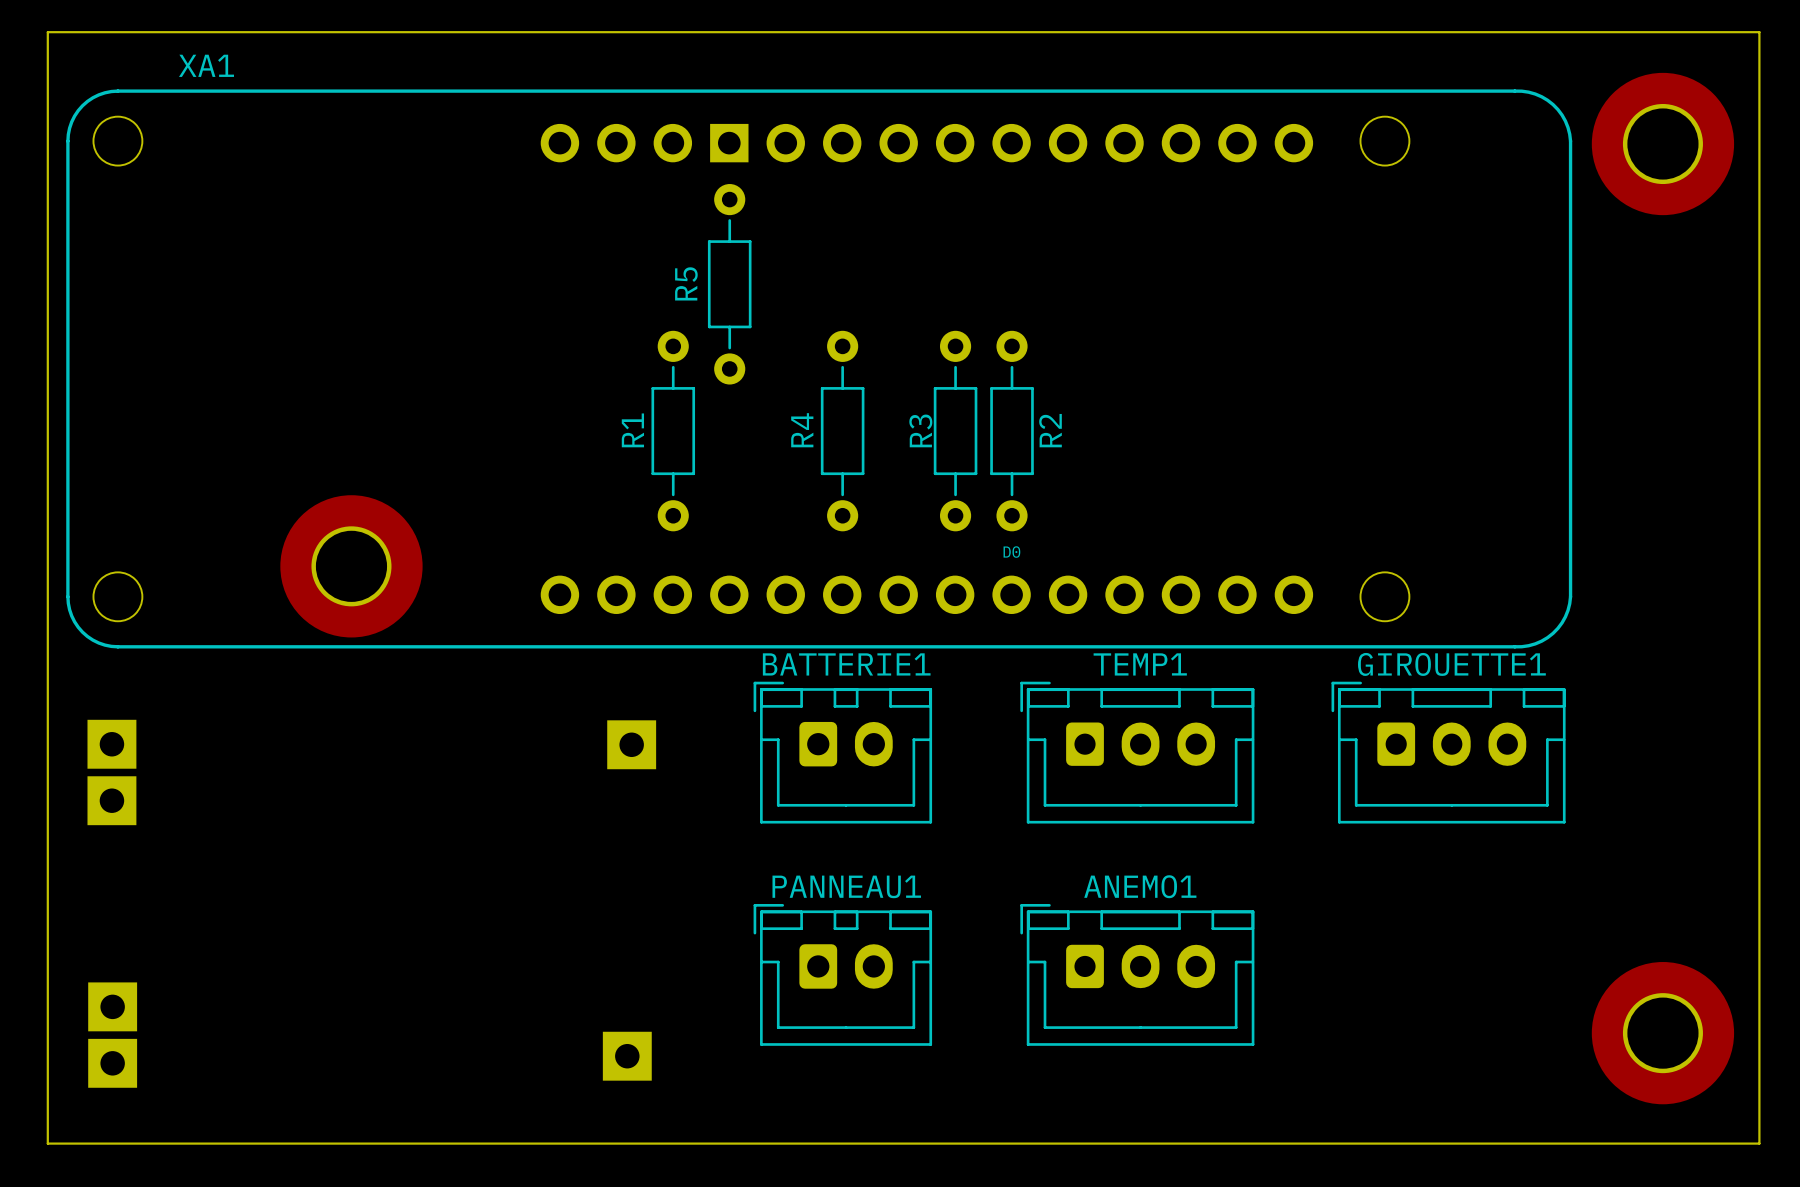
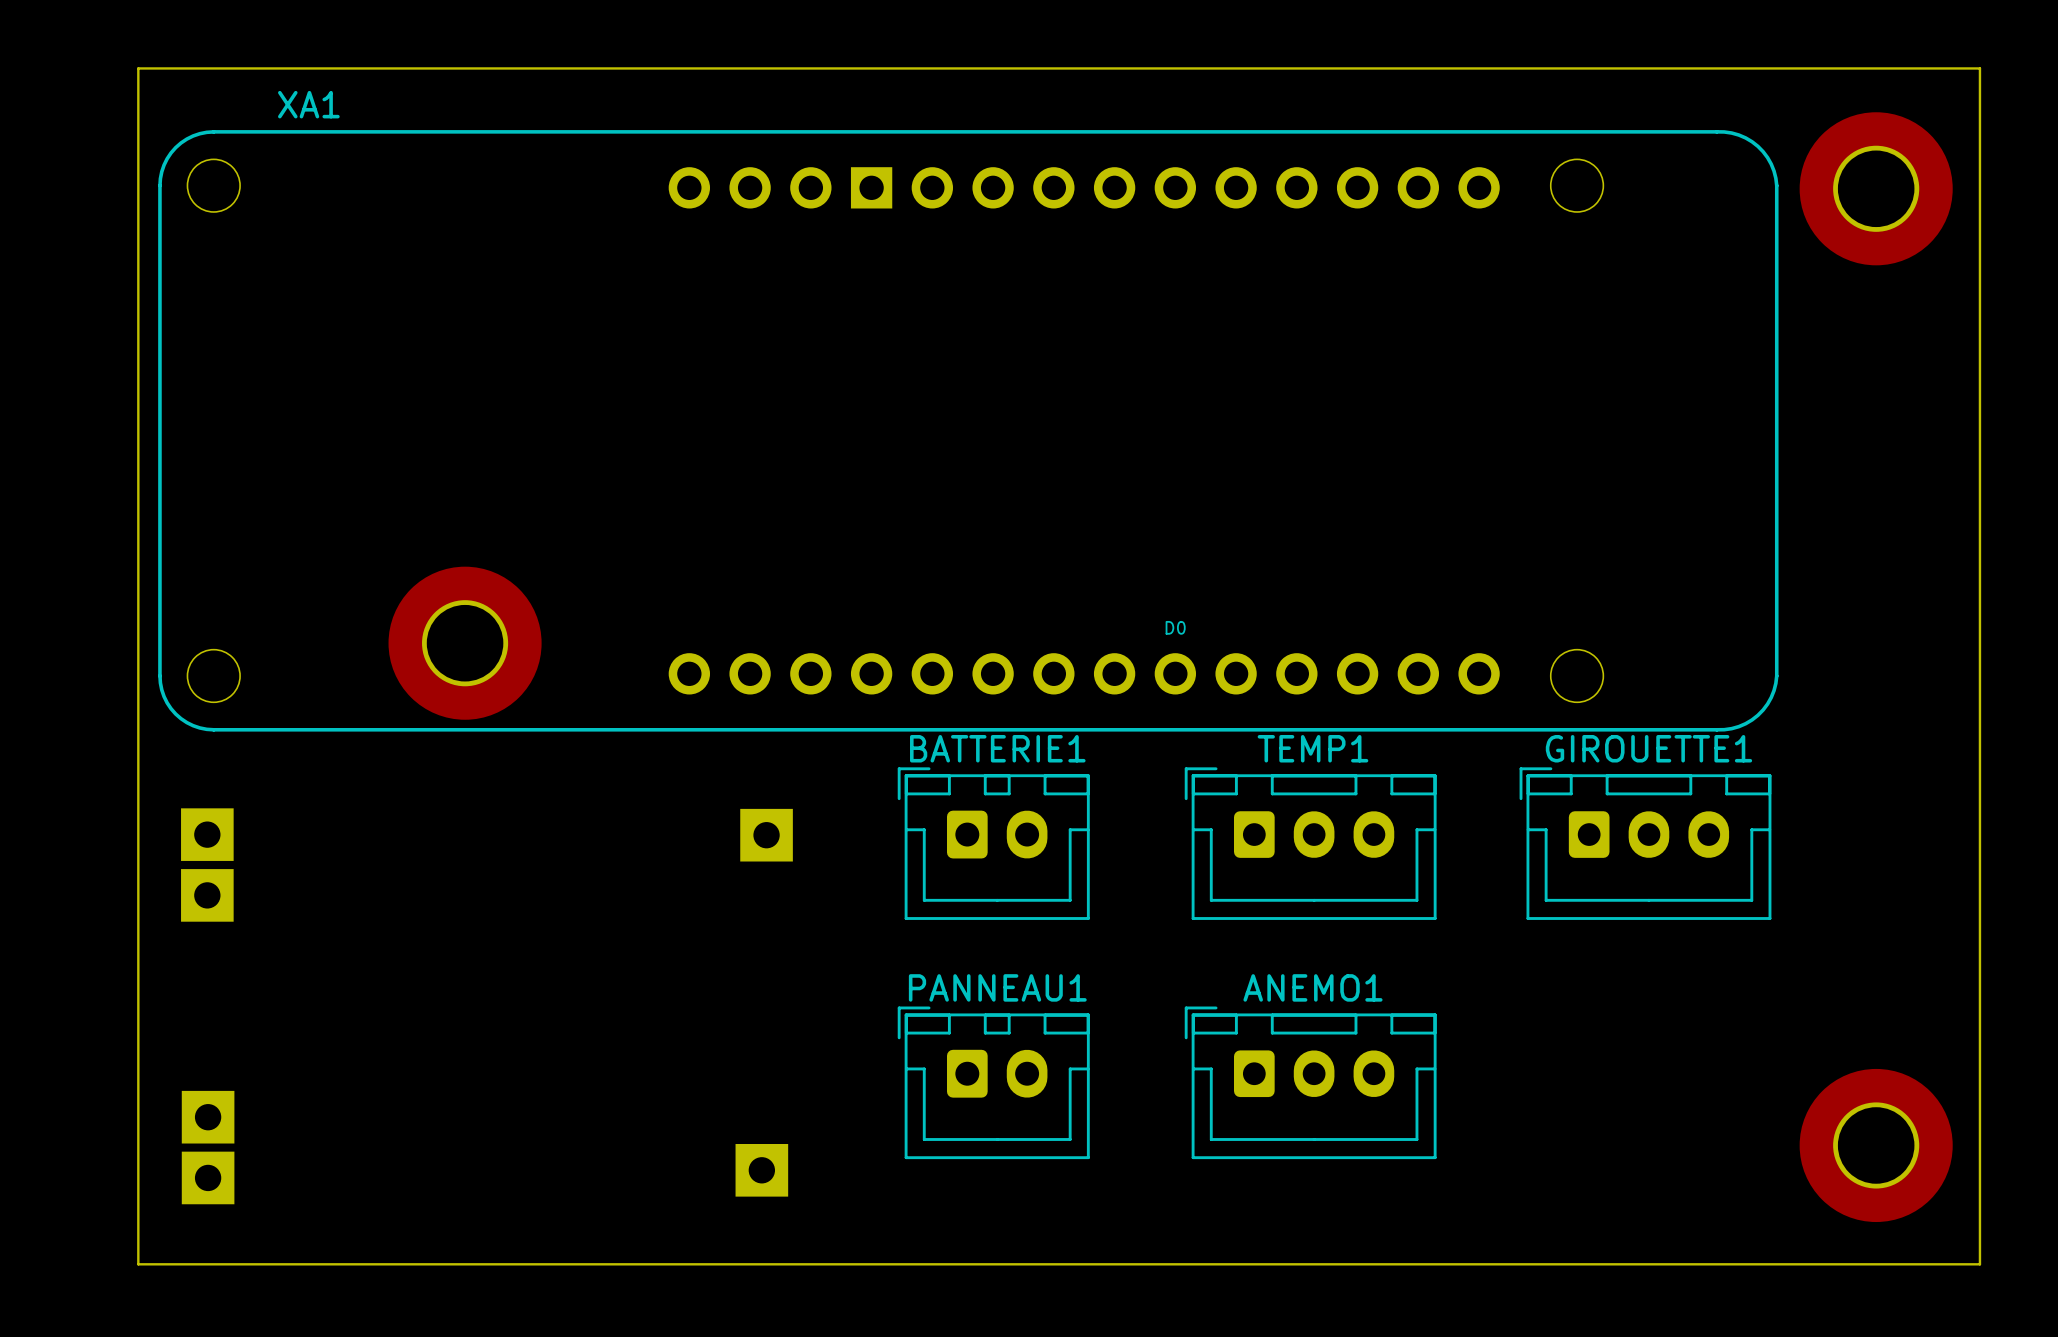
R5: (729, 284) -> none
R1: (673, 431) -> none
R4: (842, 431) -> none
R3: (955, 431) -> none
R2: (1012, 431) -> none

